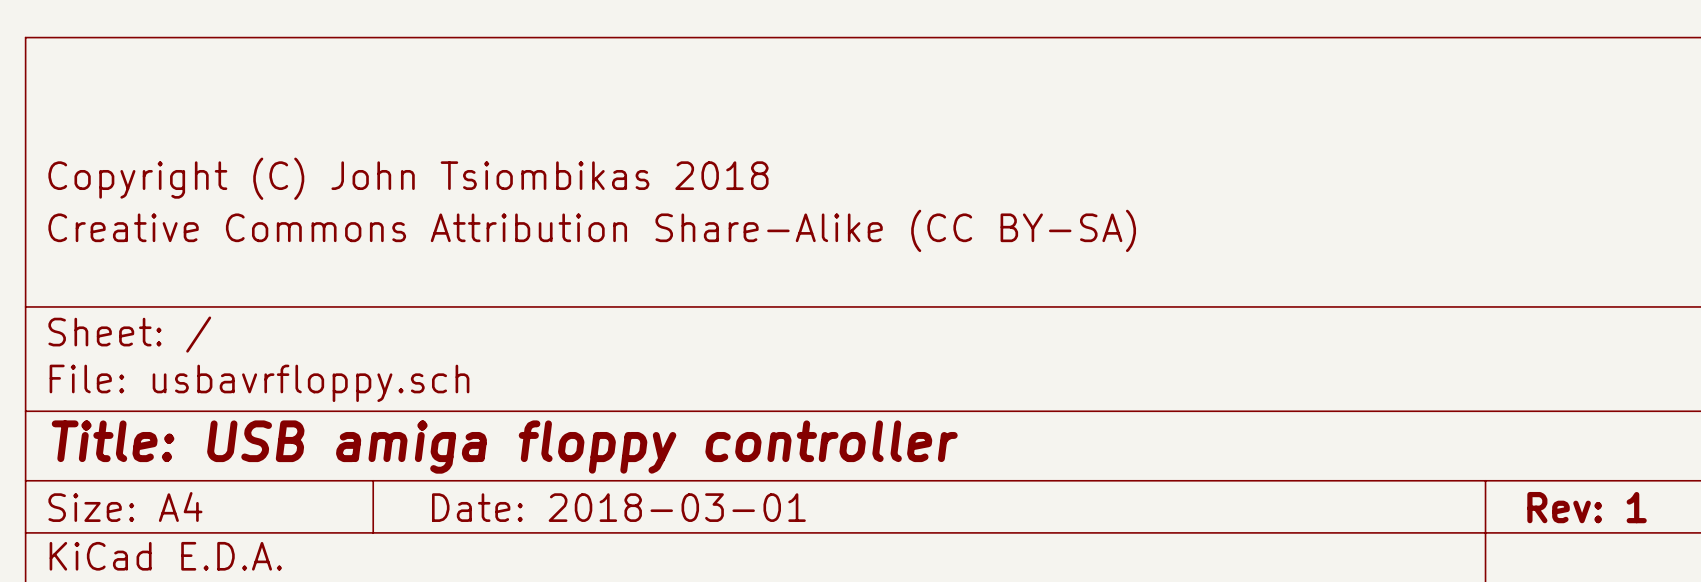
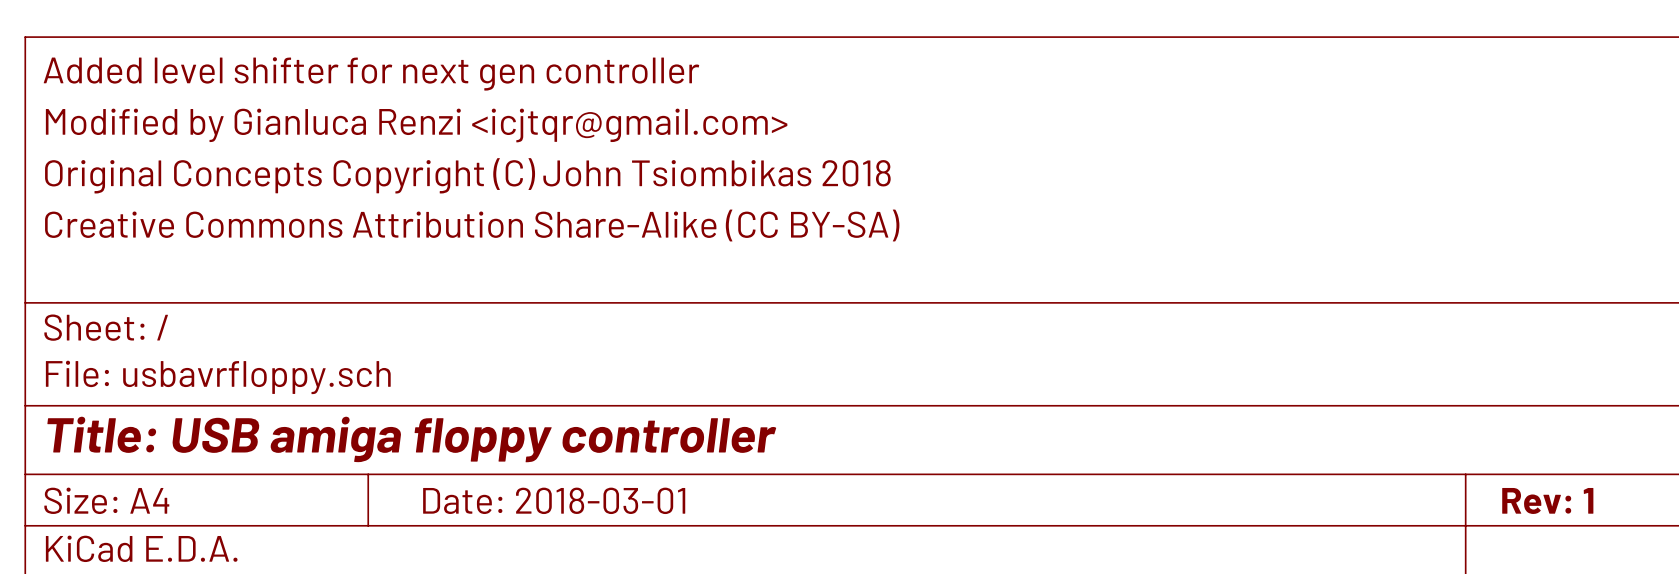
title block: none -> Added level shifter for next gen controller (371, 73)
title block: none -> Modified by Gianluca Renzi <icjtqr@gmail.com> (416, 125)
title block: Copyright (C) John Tsiombikas 2018 (408, 178) -> Original Concepts Copyright (C) John Tsiombikas 2018 (467, 175)

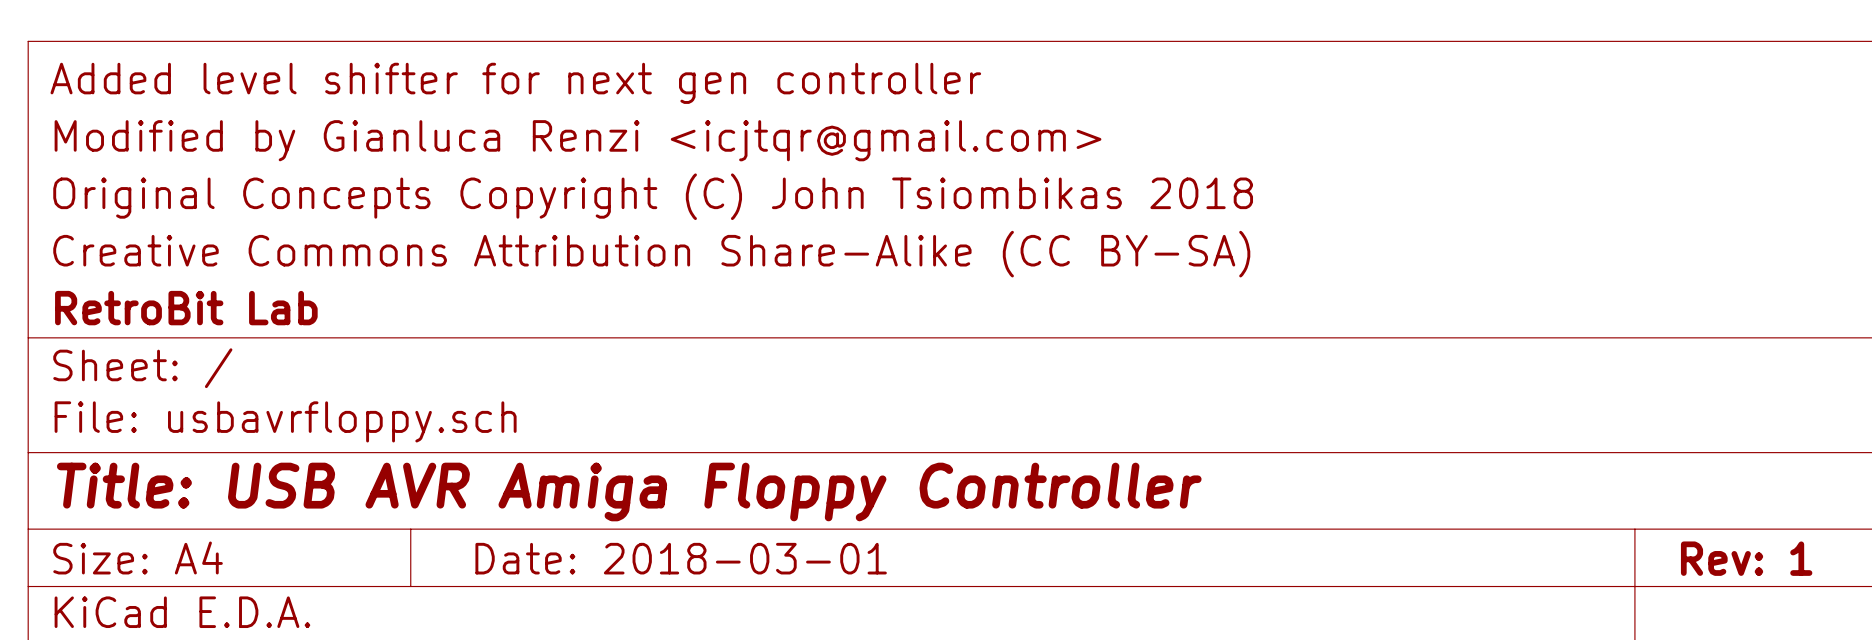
title block: none -> RetroBit Lab (186, 308)
title block: Title: USB amiga floppy controller (411, 439) -> Title: USB AVR Amiga Floppy Controller (629, 491)

